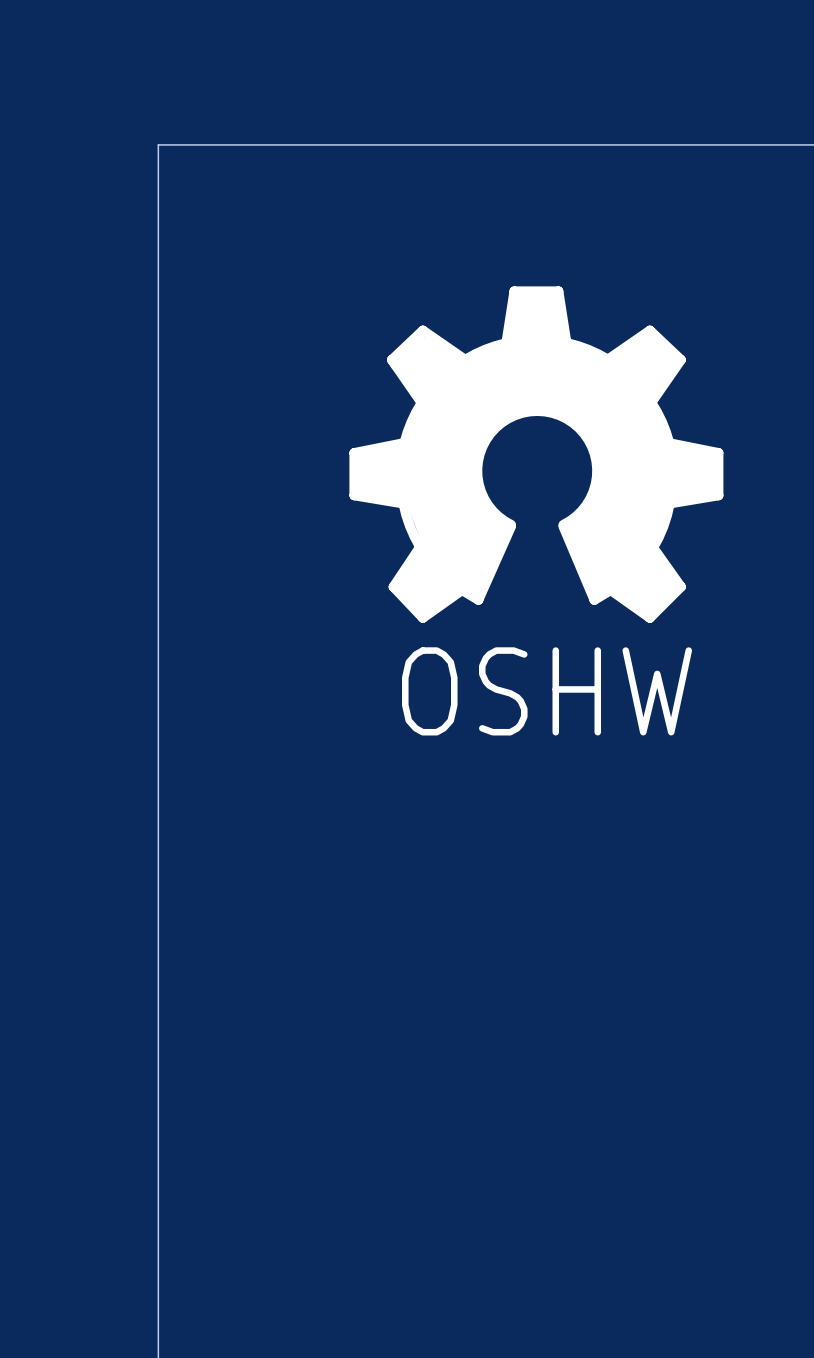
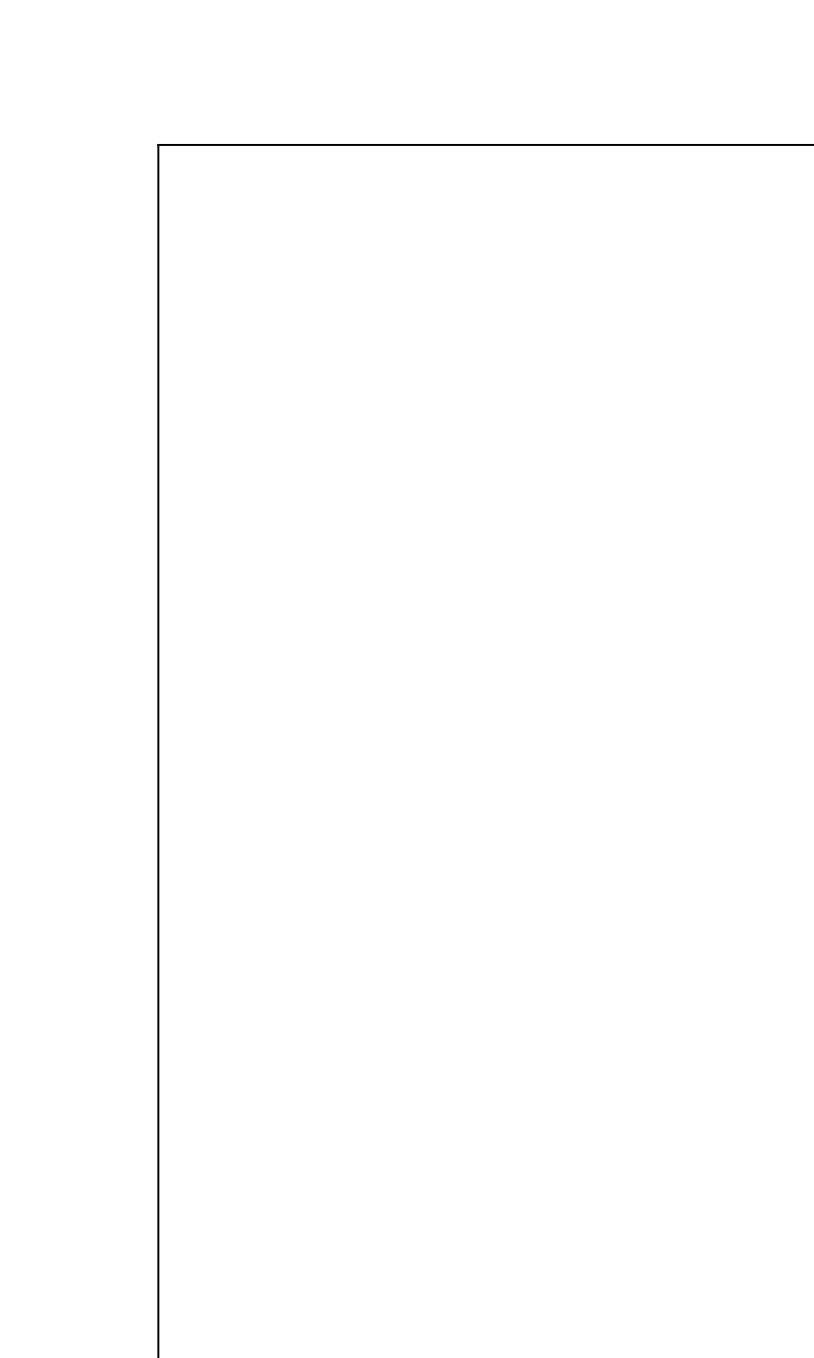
drawing: [349, 286, 724, 623] -> none
text: OSHW (547, 691) -> none

